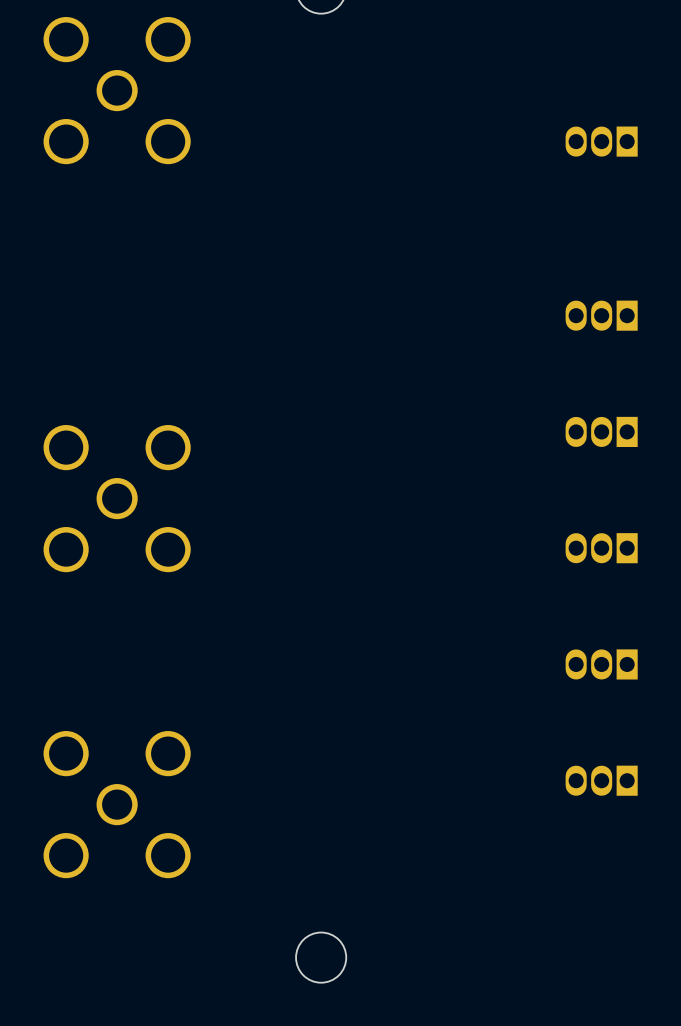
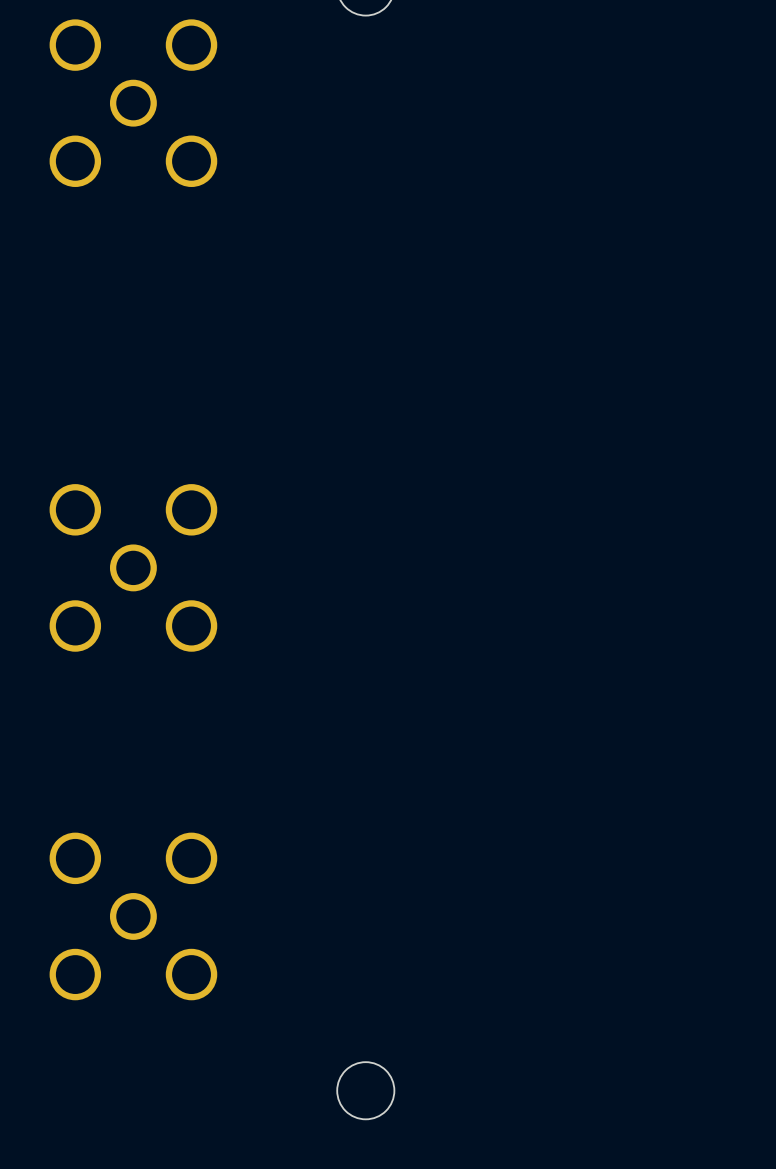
part: (601, 141) -> none
part: (601, 315) -> none
part: (601, 431) -> none
part: (601, 548) -> none
part: (601, 664) -> none
part: (601, 780) -> none

